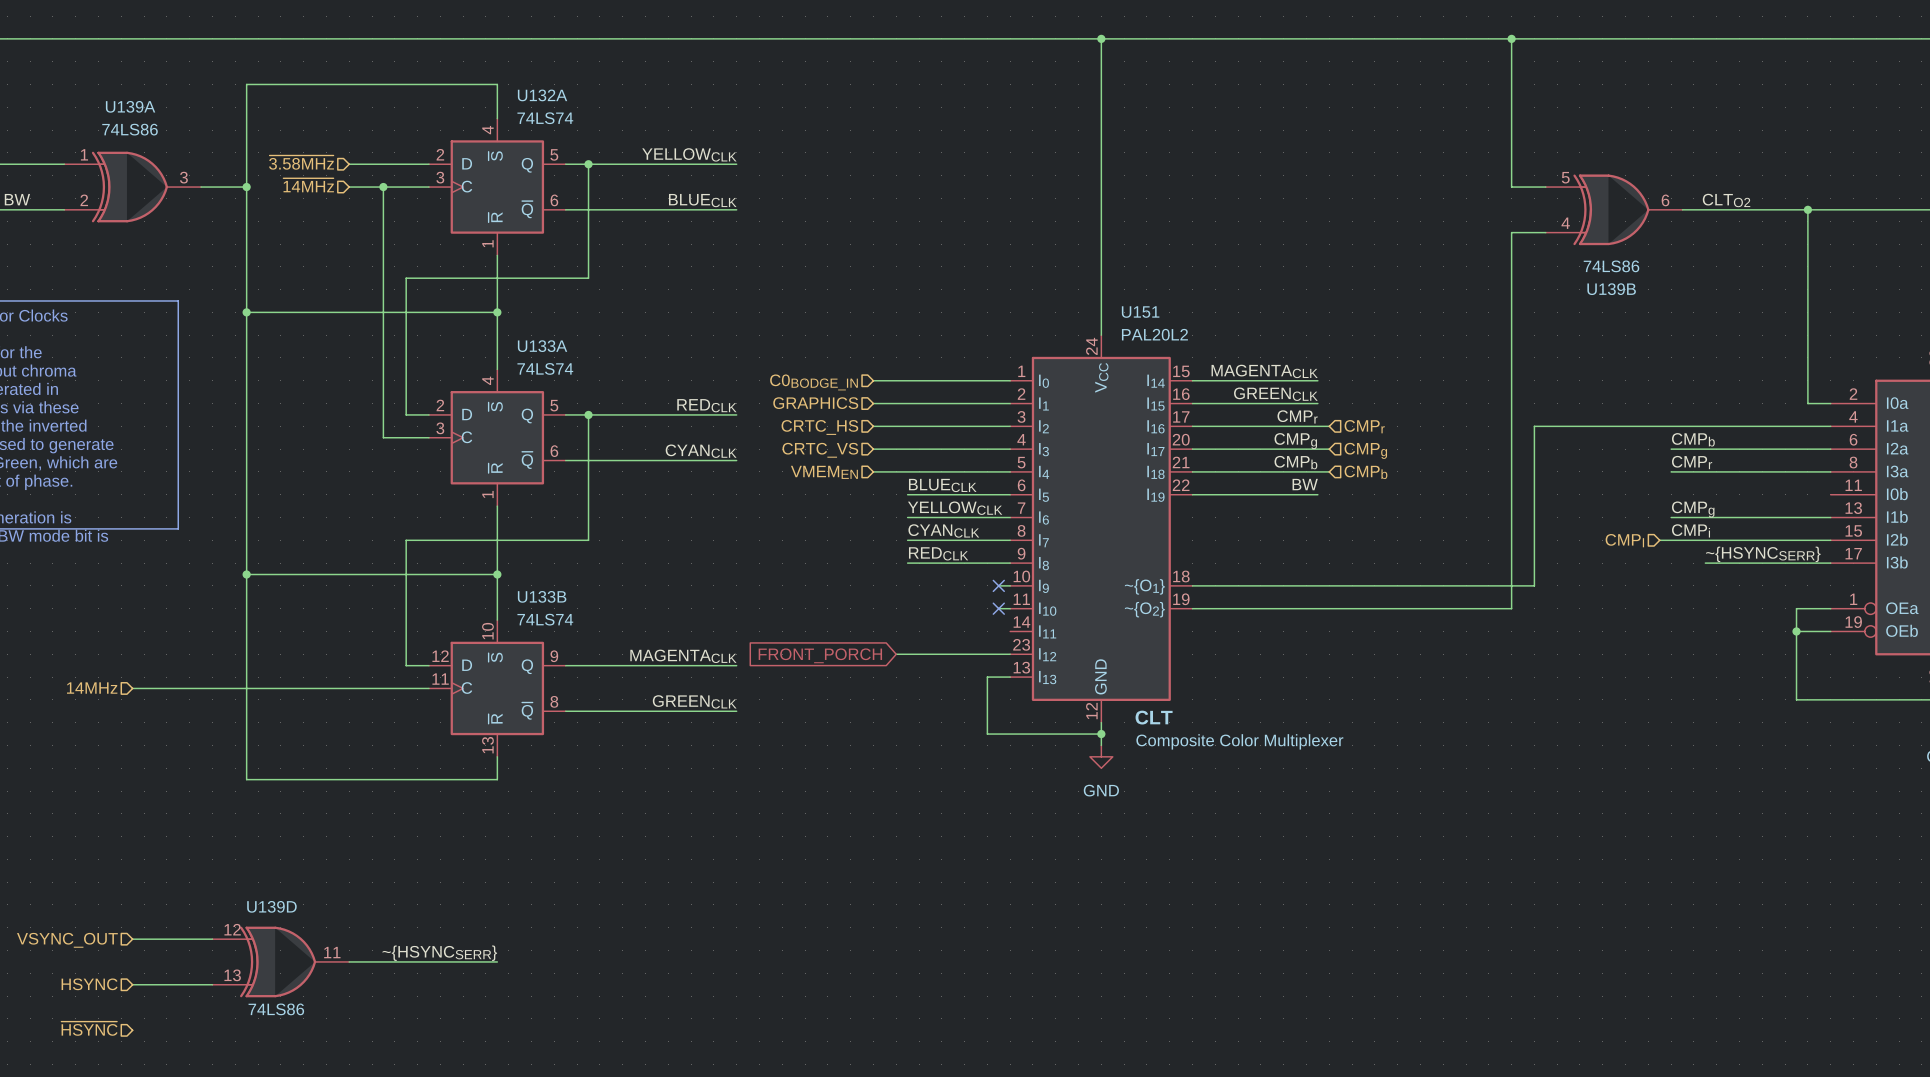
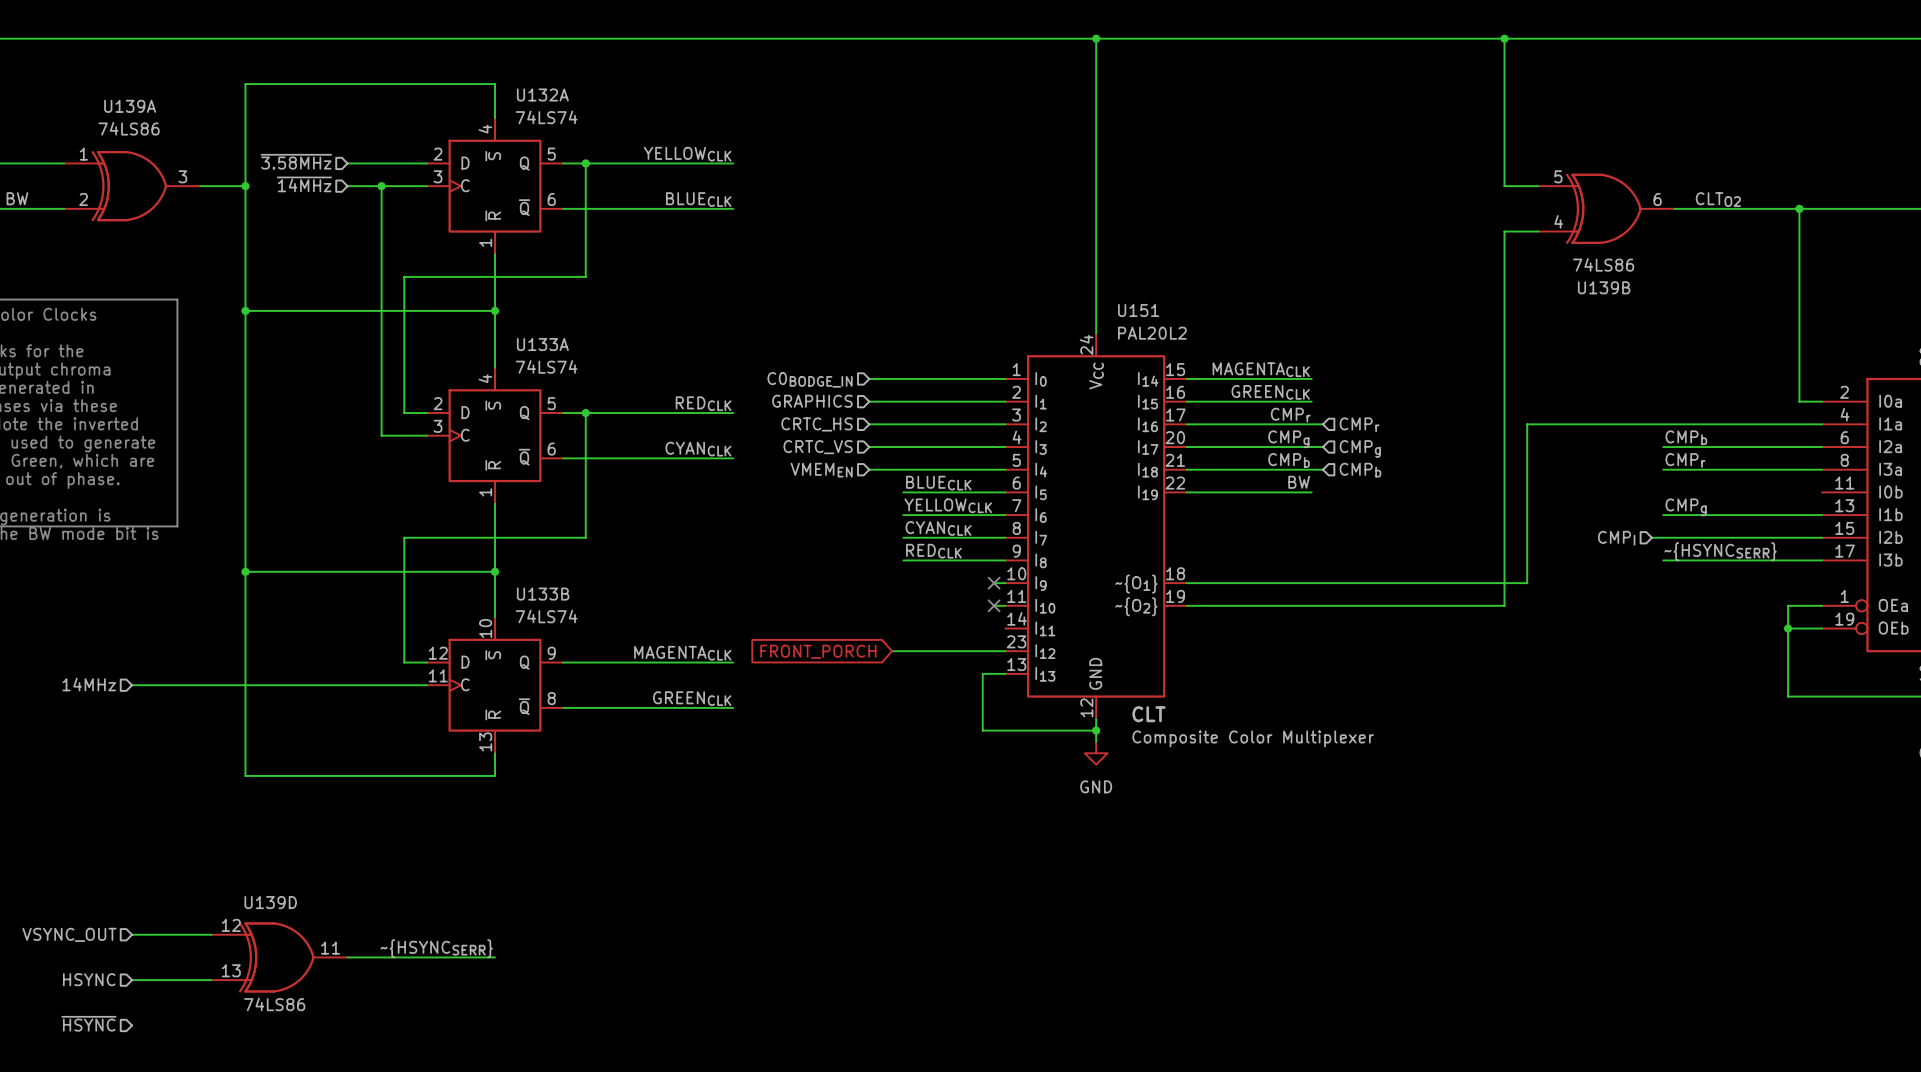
label: CMPi (1691, 530) -> none
label position: ~{HSYNCSERR} (1763, 554) -> ~{HSYNCSERR} (1720, 551)
wire: none -> (1663, 560) (1697, 560)

